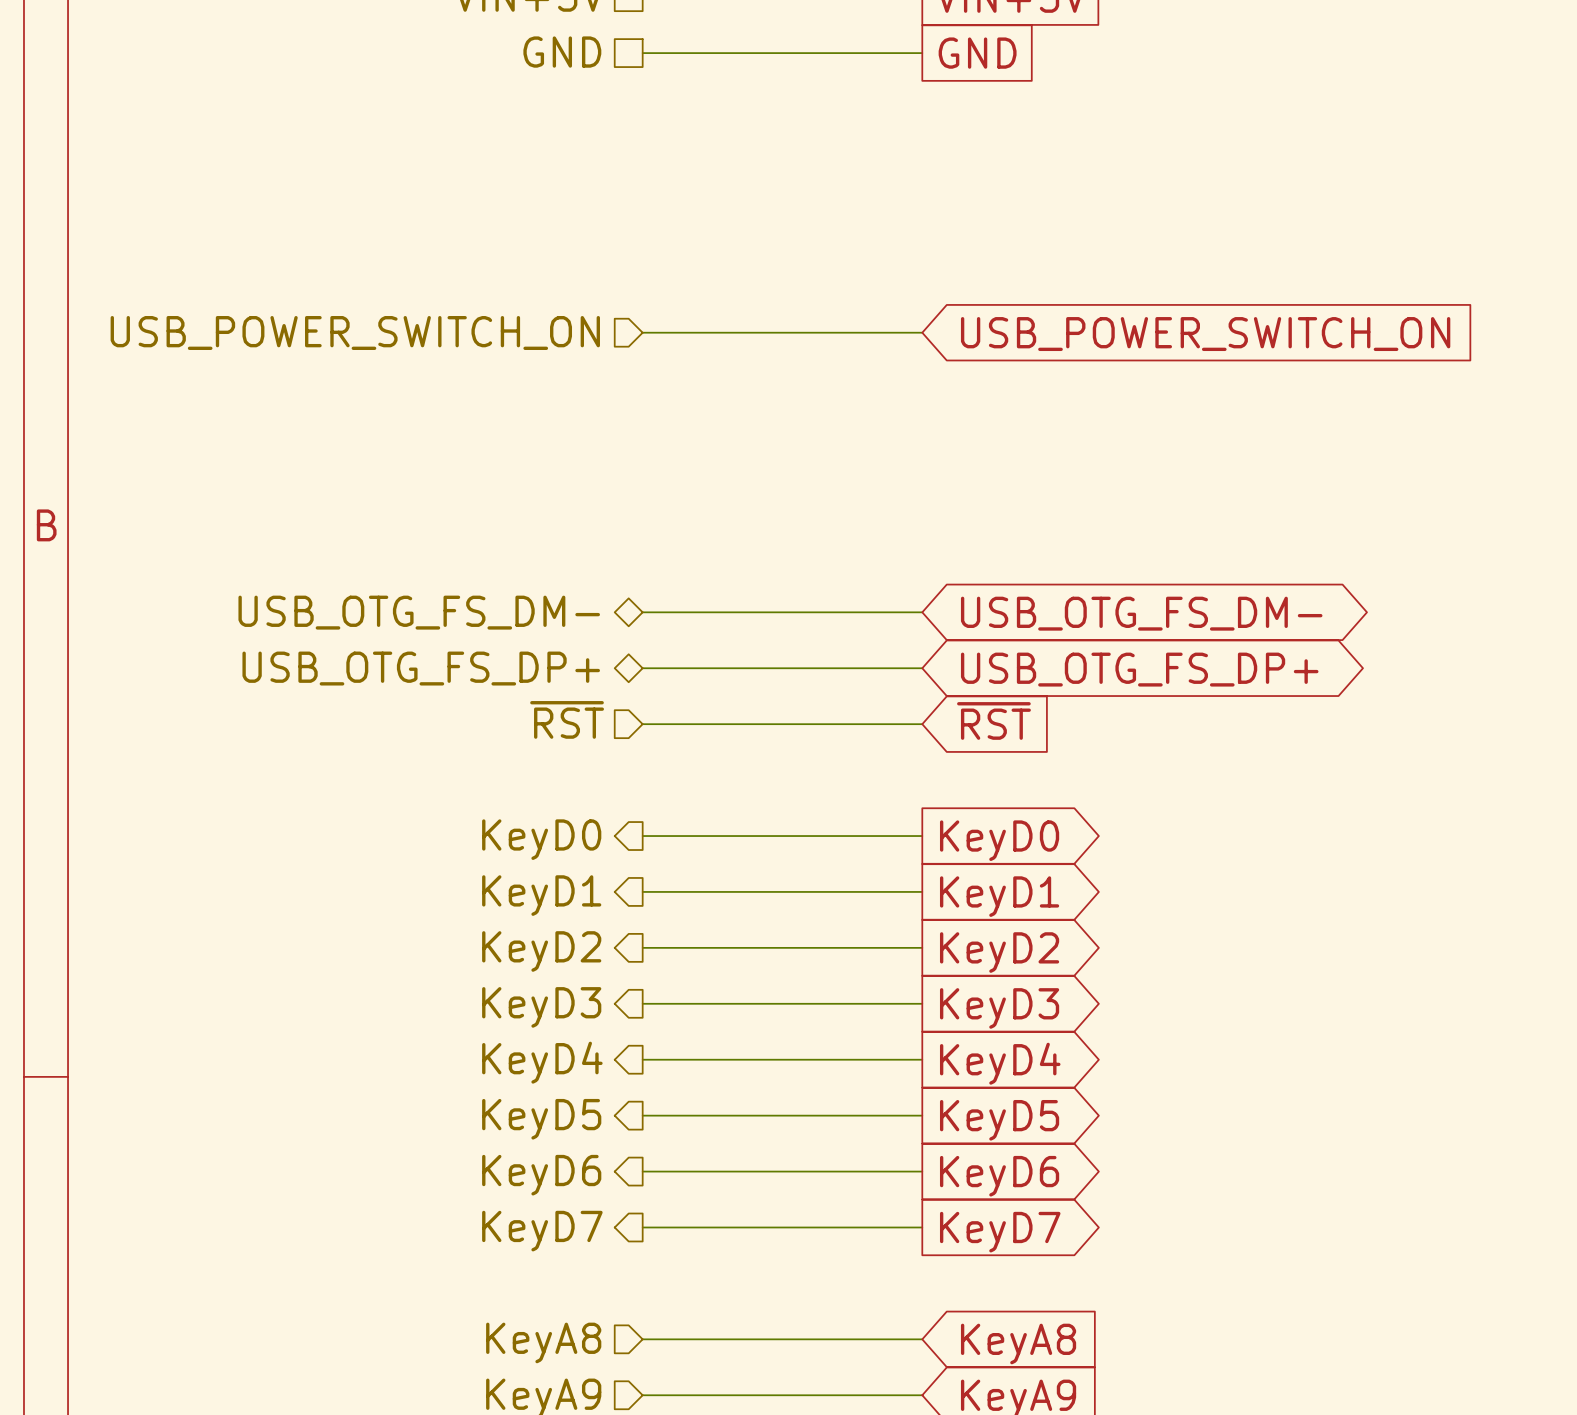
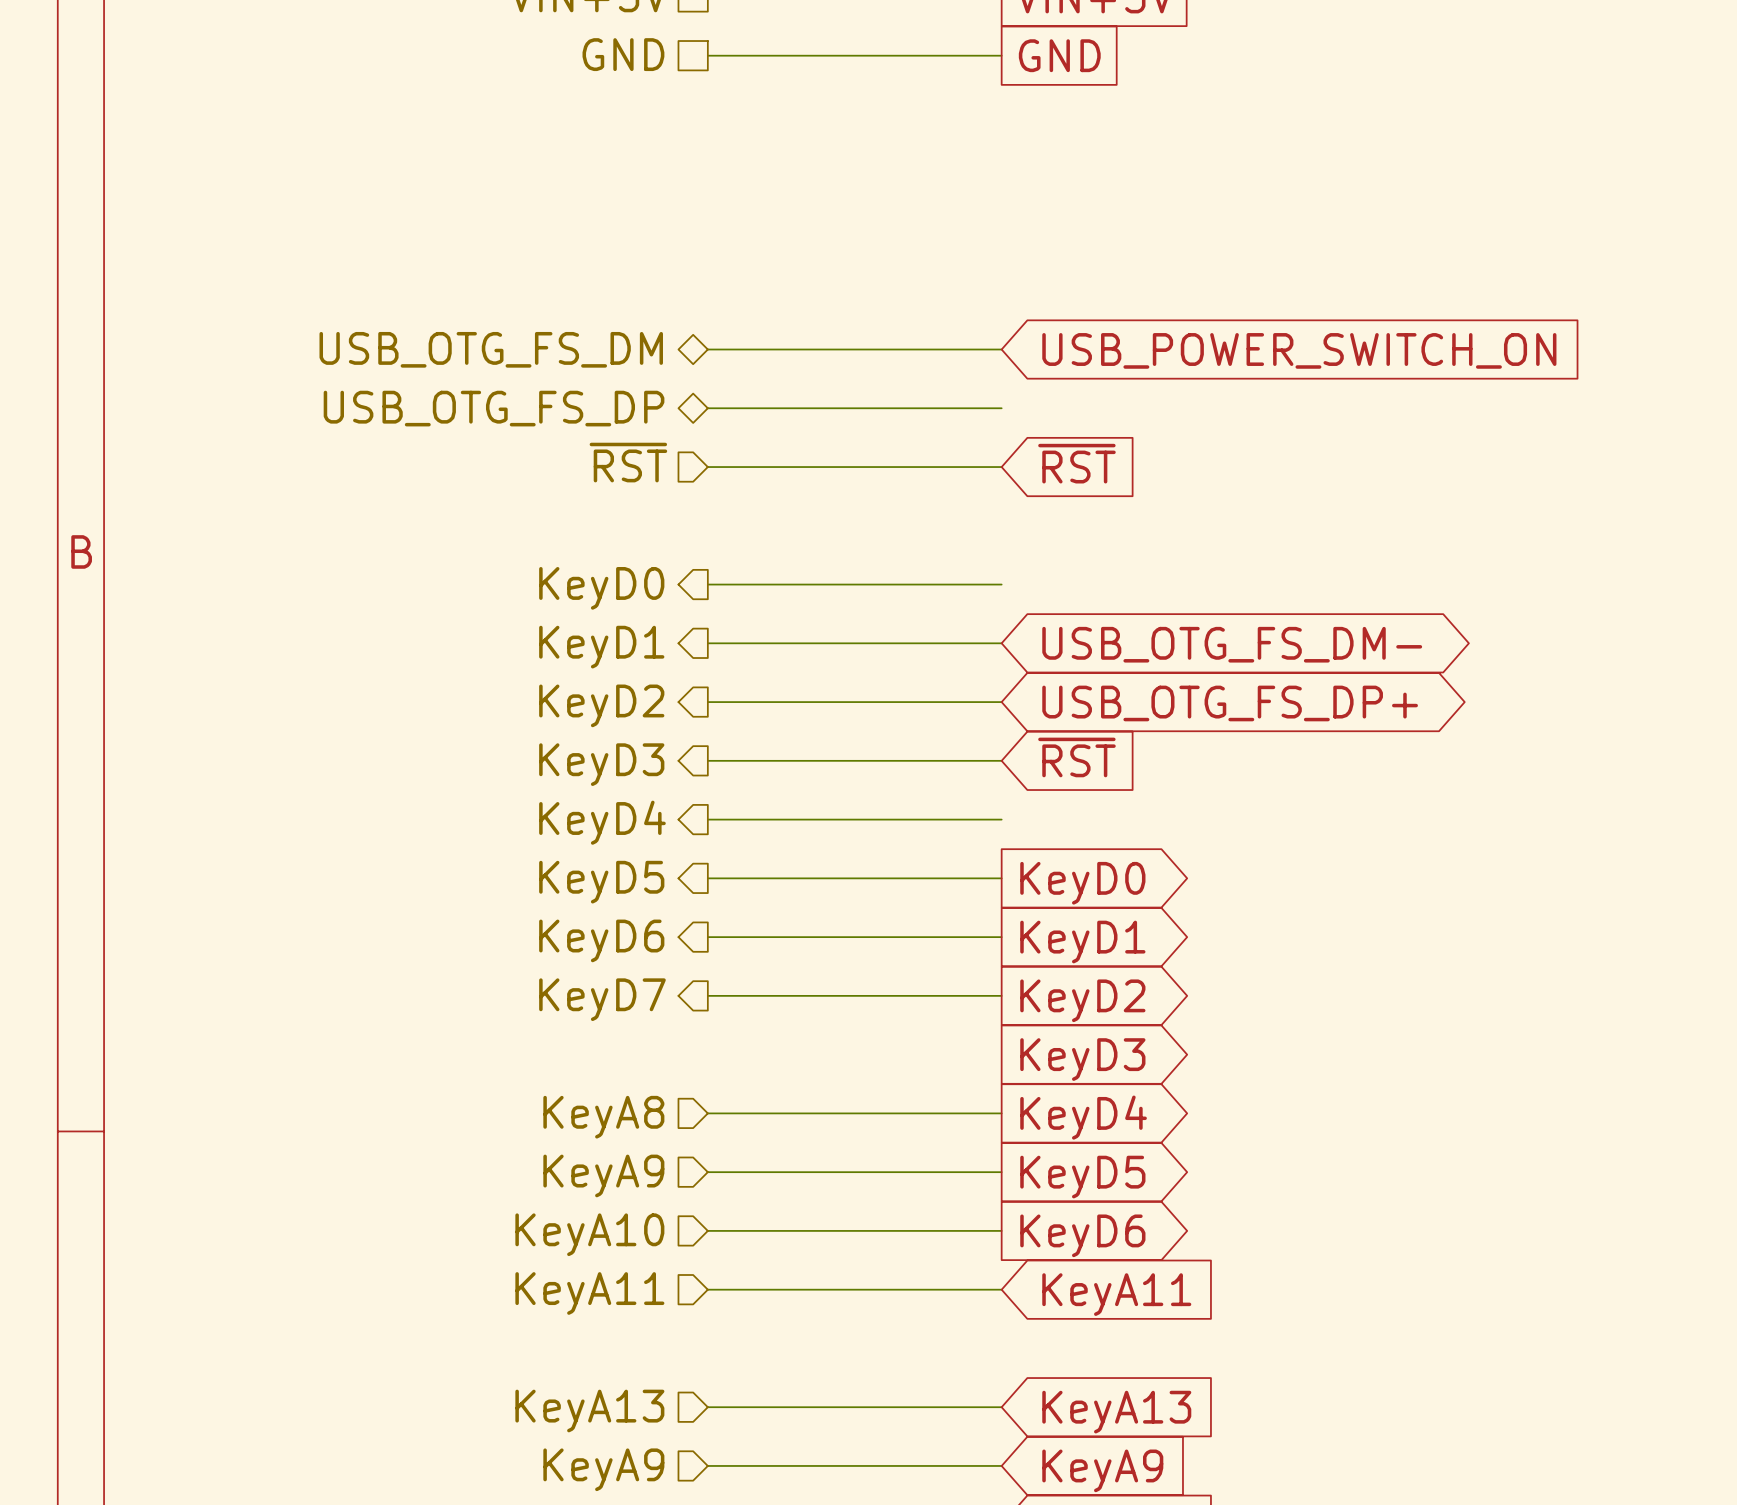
hierarchical label shape: input (355, 332) -> bidirectional (491, 349)
hierarchical label: USB_POWER_SWITCH_ON (355, 332) -> USB_OTG_FS_DM (491, 349)
hierarchical label: none -> USB_OTG_FS_DP (494, 408)
wire: none -> (707, 408) (1001, 408)
hierarchical label: none -> ~{RST} (628, 462)
global label: none -> ~{RST} (1076, 463)
wire: none -> (707, 467) (1001, 467)
wire: none -> (707, 584) (1001, 584)
hierarchical label: none -> KeyD0 (601, 588)
hierarchical label shape: bidirectional (419, 612) -> output (601, 647)
hierarchical label: USB_OTG_FS_DM- (419, 612) -> KeyD1 (601, 647)
hierarchical label shape: bidirectional (421, 668) -> output (601, 705)
hierarchical label: USB_OTG_FS_DP+ (421, 668) -> KeyD2 (601, 705)
hierarchical label shape: input (567, 719) -> output (601, 764)
hierarchical label: ~{RST} (567, 719) -> KeyD3 (601, 764)
hierarchical label: none -> KeyD4 (602, 822)
hierarchical label: KeyD0 (541, 839) -> KeyD5 (601, 882)
hierarchical label: KeyD1 (541, 895) -> KeyD6 (601, 940)
hierarchical label: KeyD2 (541, 951) -> KeyD7 (602, 999)
wire: (642, 1003) (922, 1003) -> (707, 819) (1001, 819)
hierarchical label: KeyD3 (541, 1007) -> none
hierarchical label shape: output (542, 1062) -> input (603, 1117)
hierarchical label: KeyD4 (542, 1062) -> KeyA8 (603, 1117)
hierarchical label shape: output (541, 1119) -> input (603, 1175)
hierarchical label: KeyD5 (541, 1119) -> KeyA9 (603, 1175)
hierarchical label shape: output (541, 1175) -> input (589, 1234)
hierarchical label: KeyD6 (541, 1175) -> KeyA10 (589, 1234)
hierarchical label shape: output (542, 1231) -> input (589, 1293)
hierarchical label: KeyD7 (542, 1231) -> KeyA11 (589, 1293)
global label shape: output (1000, 1232) -> input (1116, 1294)
global label: KeyD7 (1000, 1232) -> KeyA11 (1116, 1294)
hierarchical label: KeyA8 (543, 1342) -> KeyA13 (589, 1411)
global label: KeyA8 (1018, 1344) -> KeyA13 (1116, 1412)

